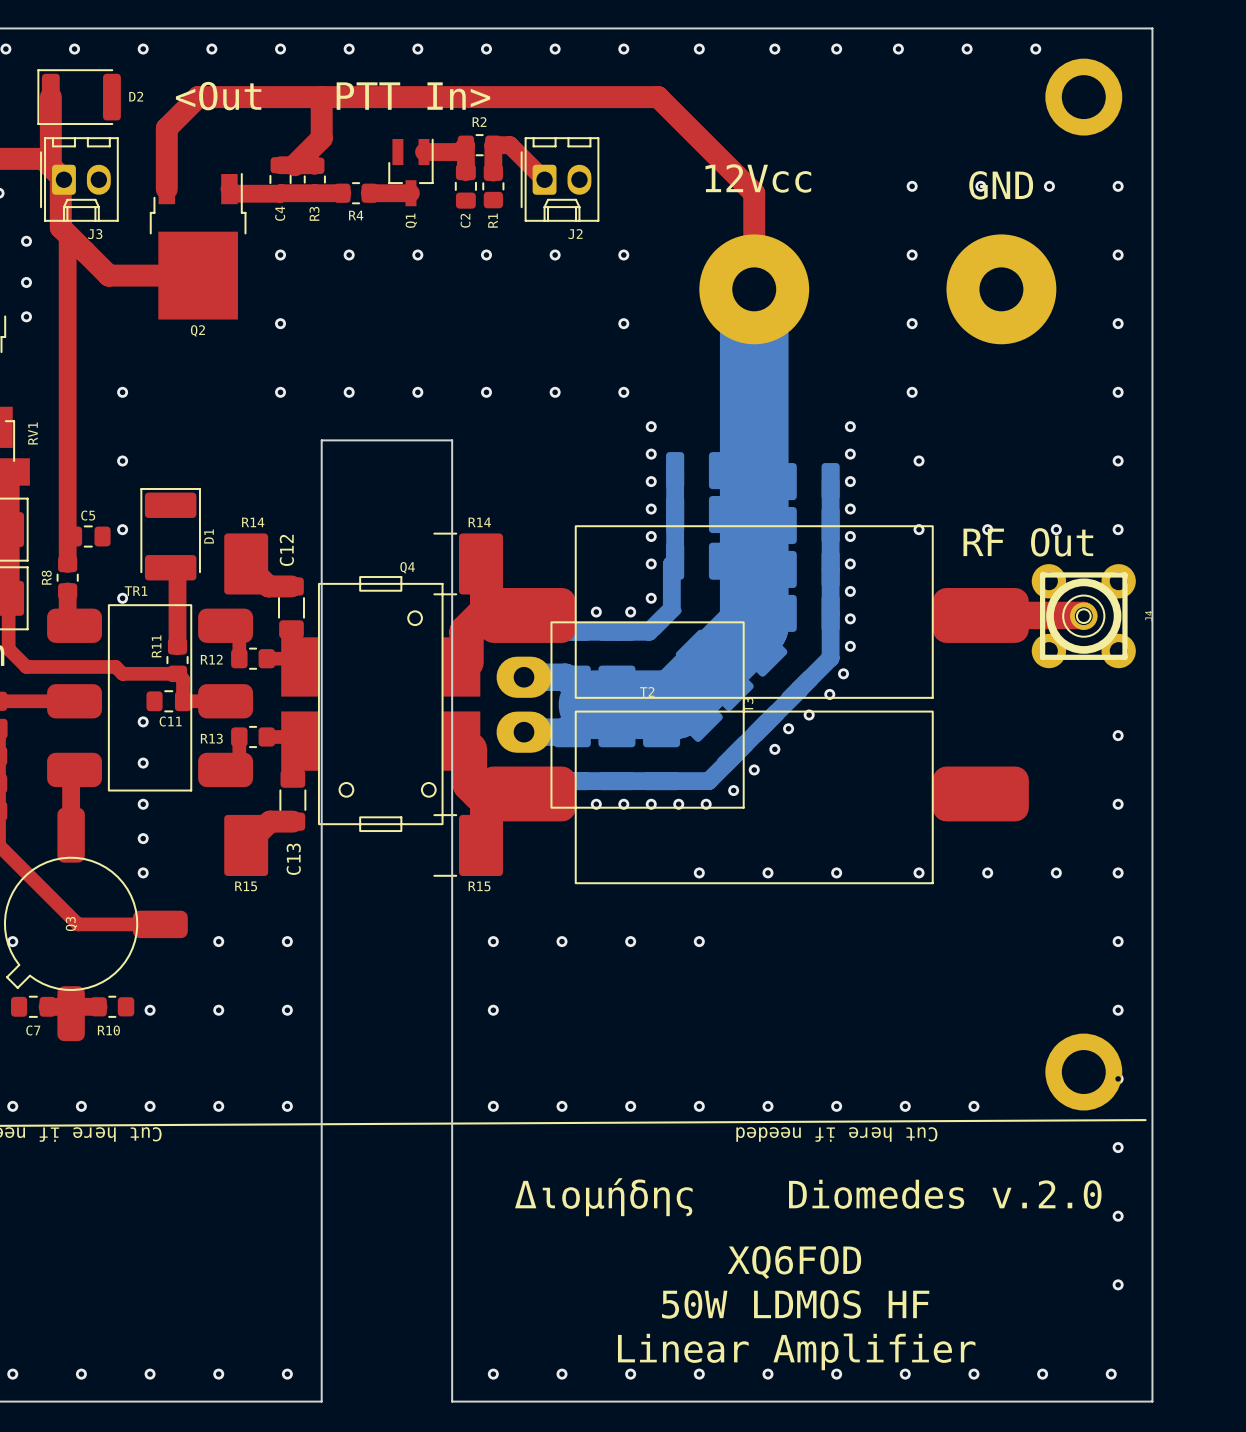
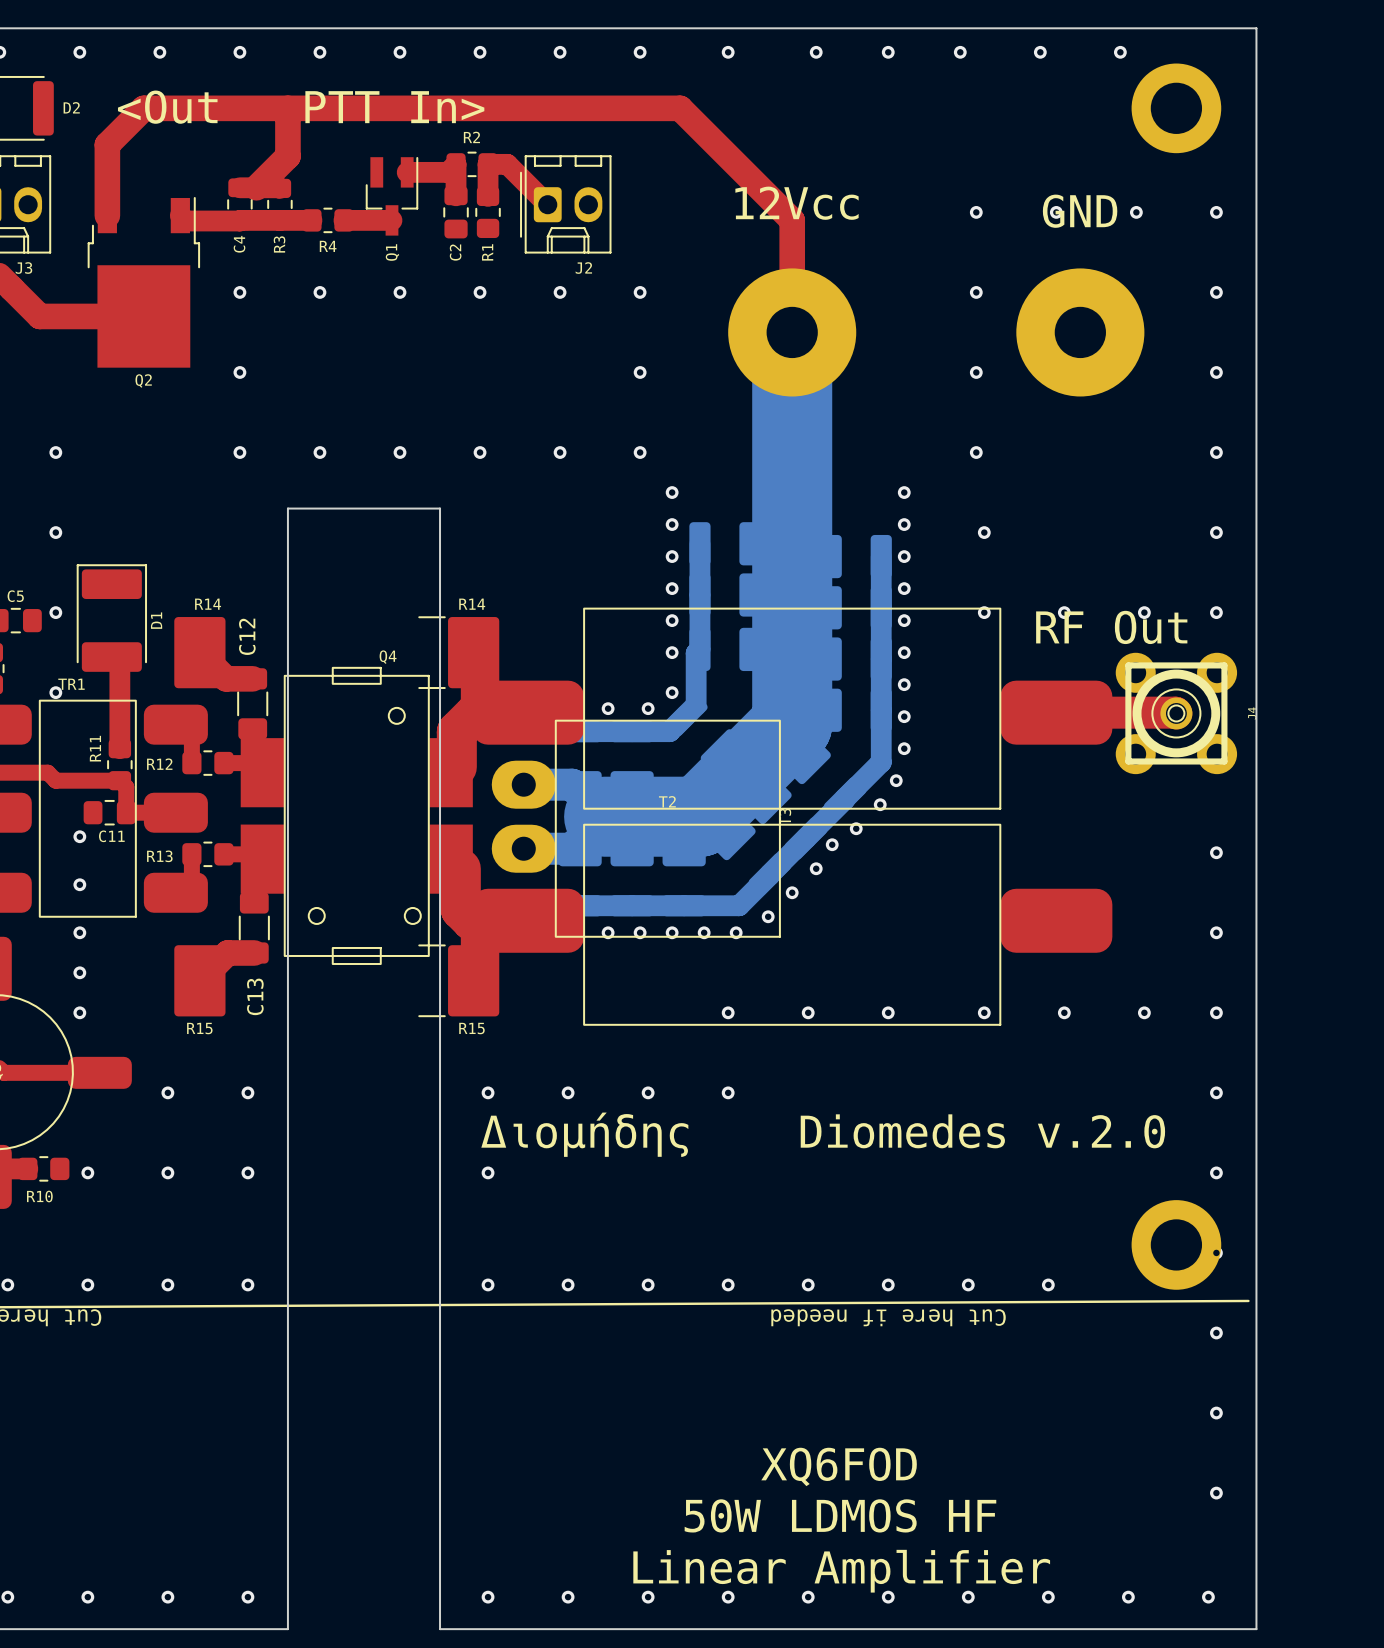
text position: Διομήδης Diomedes v.2.0 (808, 1197) -> Διομήδης Diomedes v.2.0 (823, 1134)

